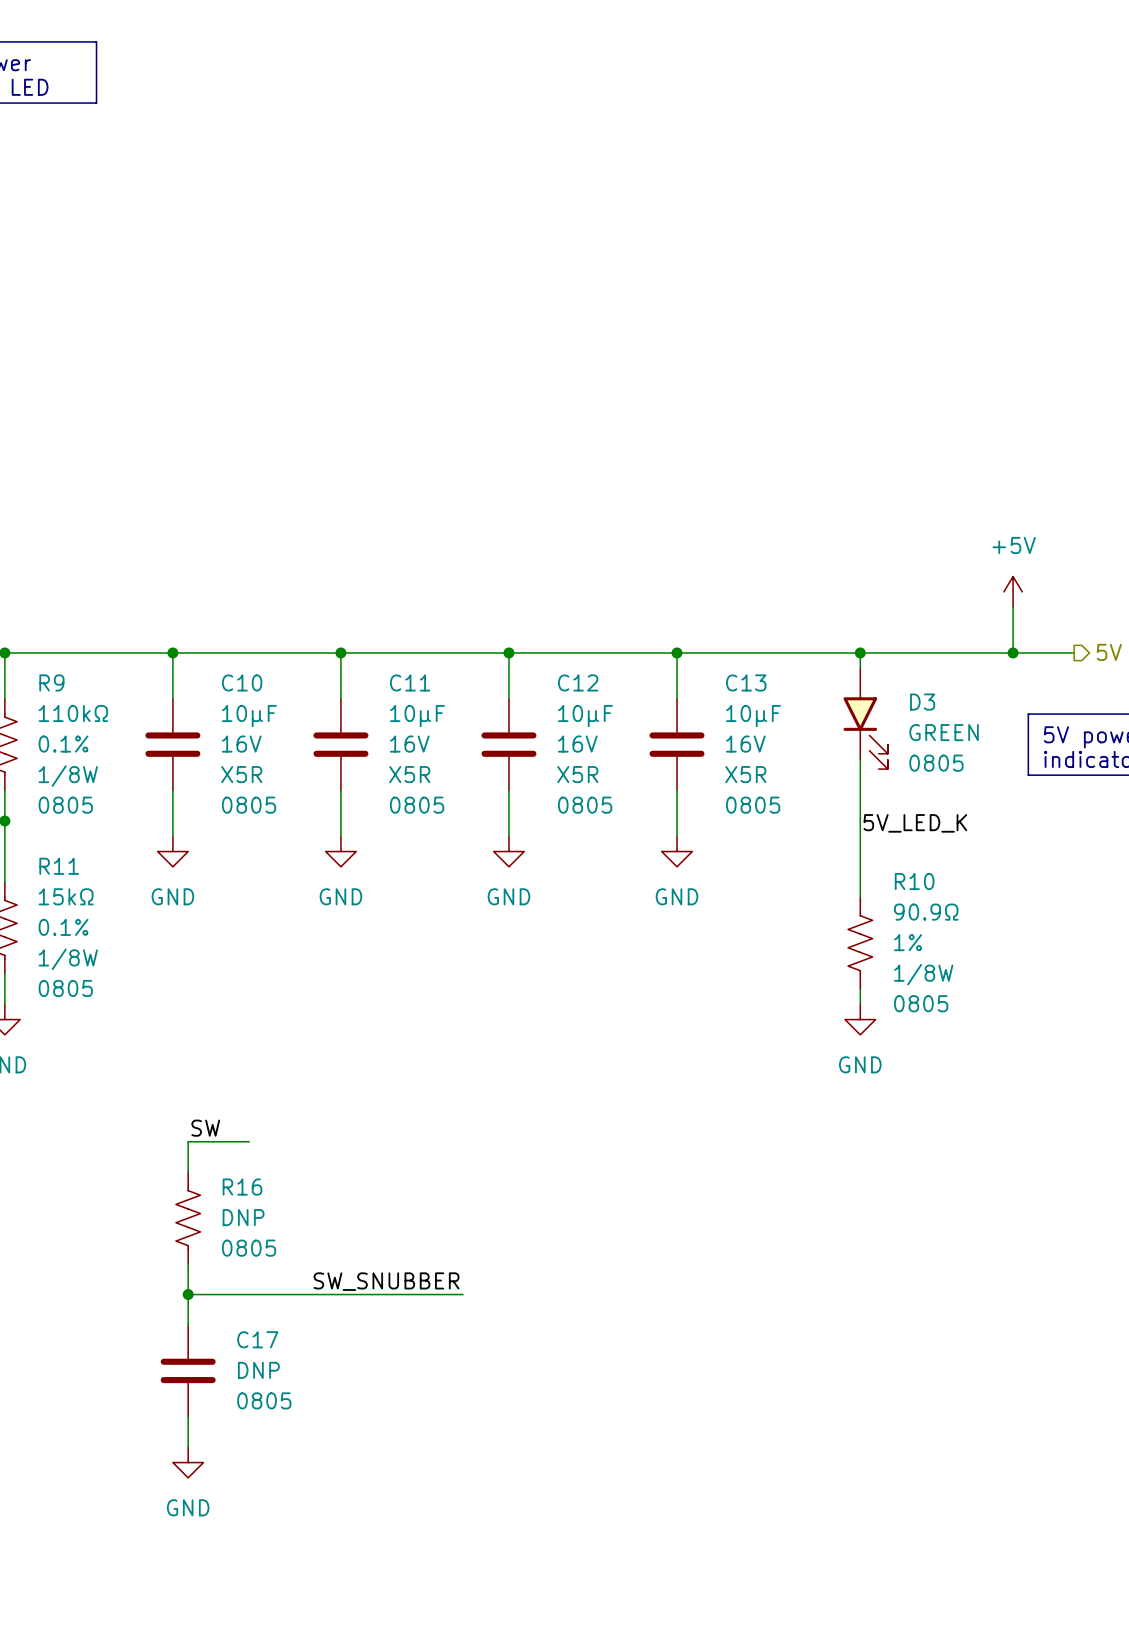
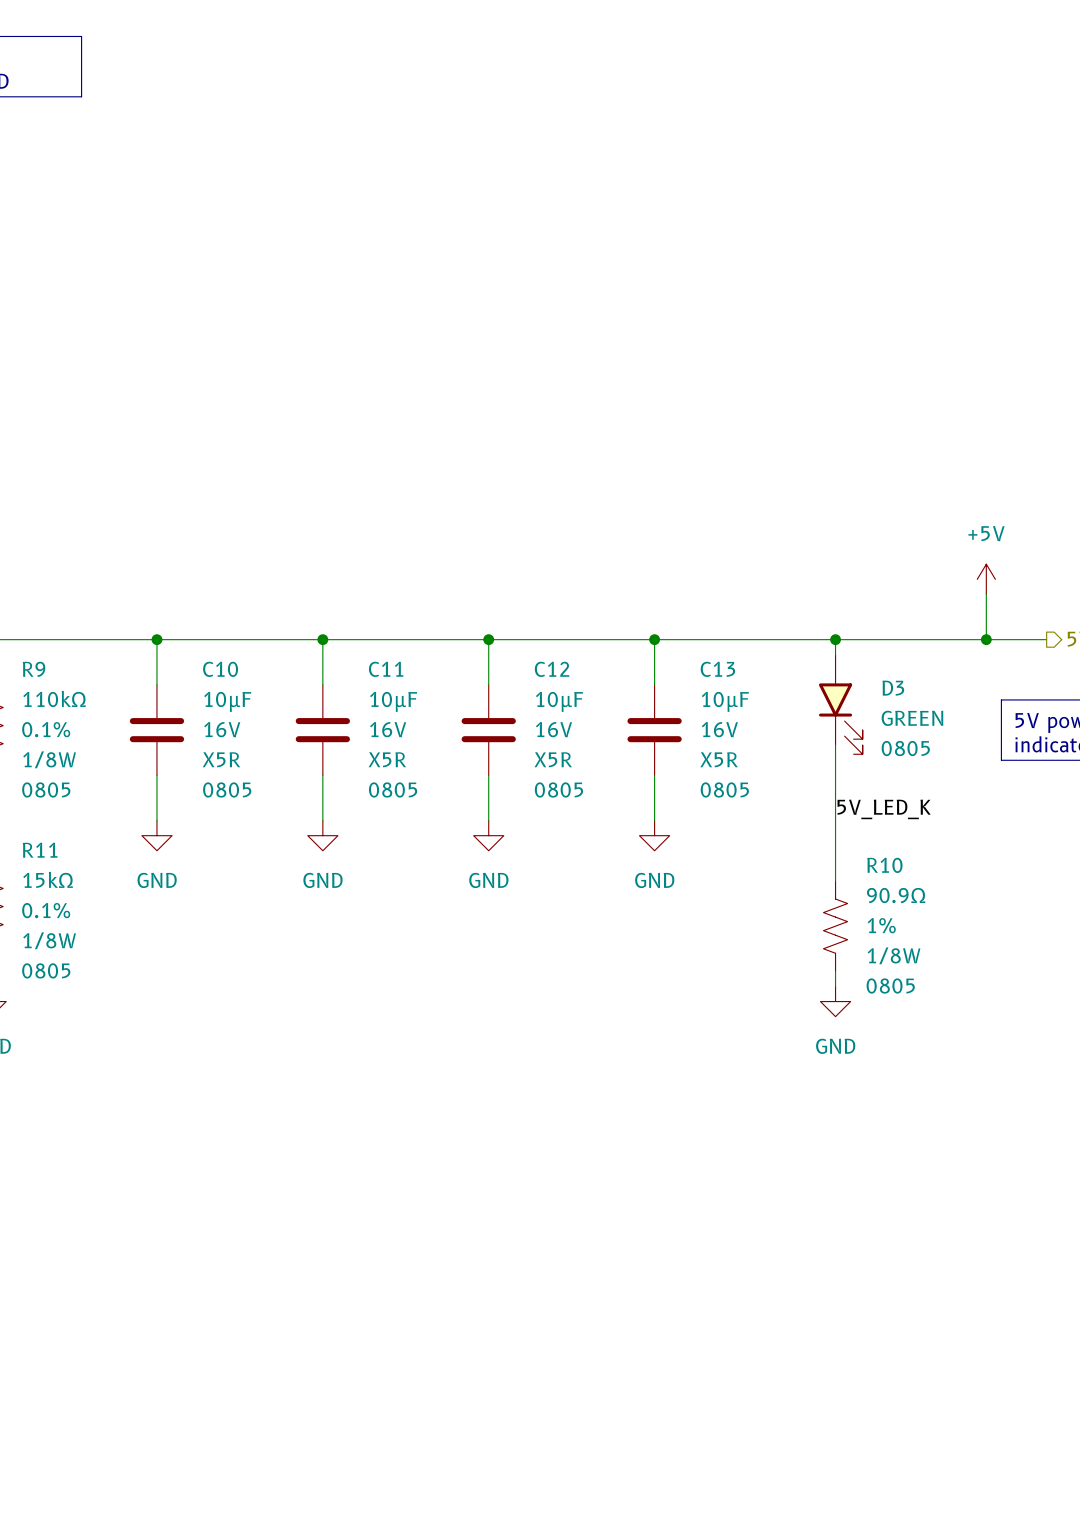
label: SW (205, 1128) -> none
wire: (249, 1141) (188, 1141) (188, 1172) -> none
R16: (188, 1218) -> none
wire: (188, 1263) (188, 1325) -> none
label: SW_SNUBBER (386, 1281) -> none
wire: (188, 1294) (463, 1294) -> none
junction: (188, 1294) -> none
C17: DNP (188, 1370) -> none
wire: (188, 1416) (188, 1447) -> none
power symbol: GND (188, 1462) -> none

